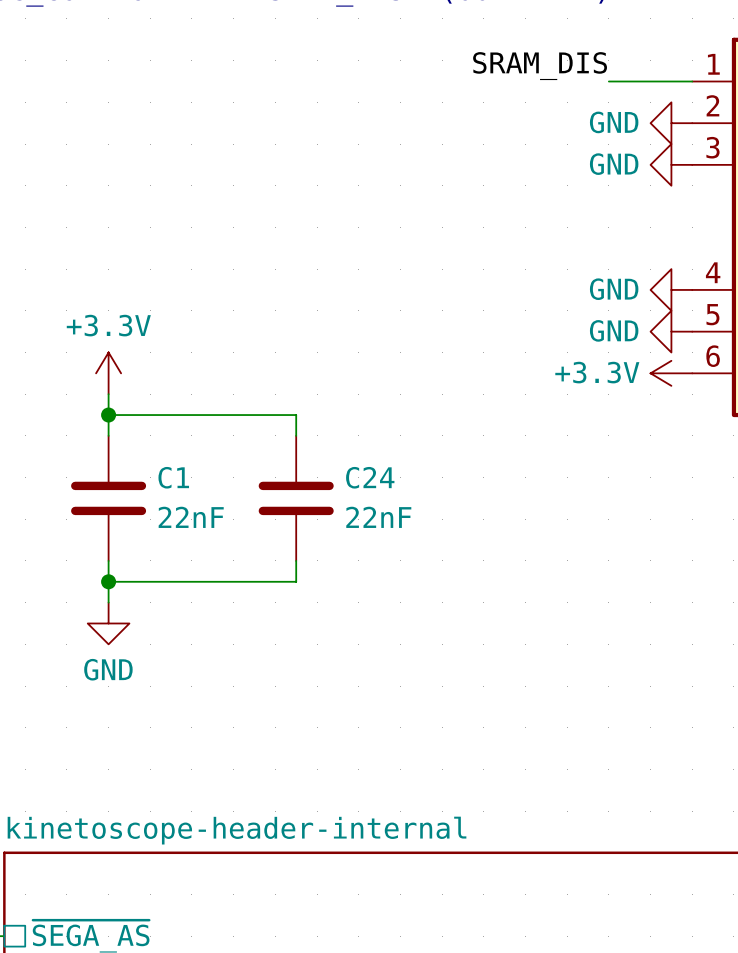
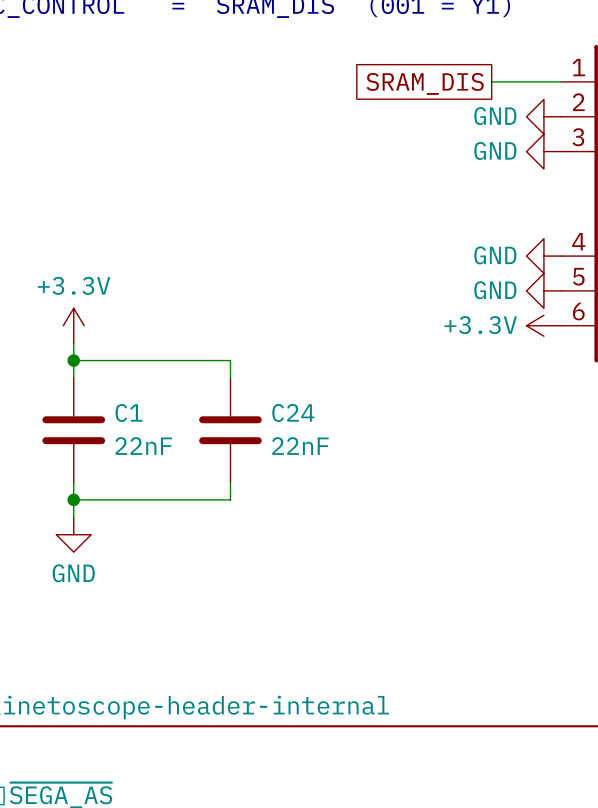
label: SRAM_DIS (540, 66) -> none
global label: none -> SRAM_DIS (425, 83)

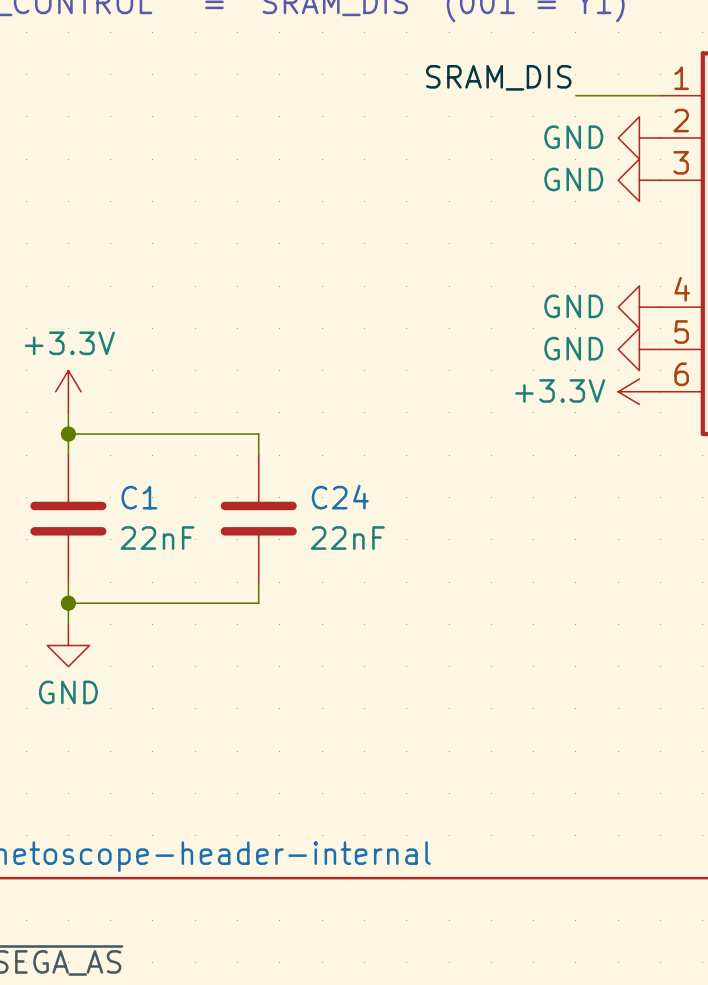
label: none -> SRAM_DIS (498, 77)
global label: SRAM_DIS (425, 83) -> none

